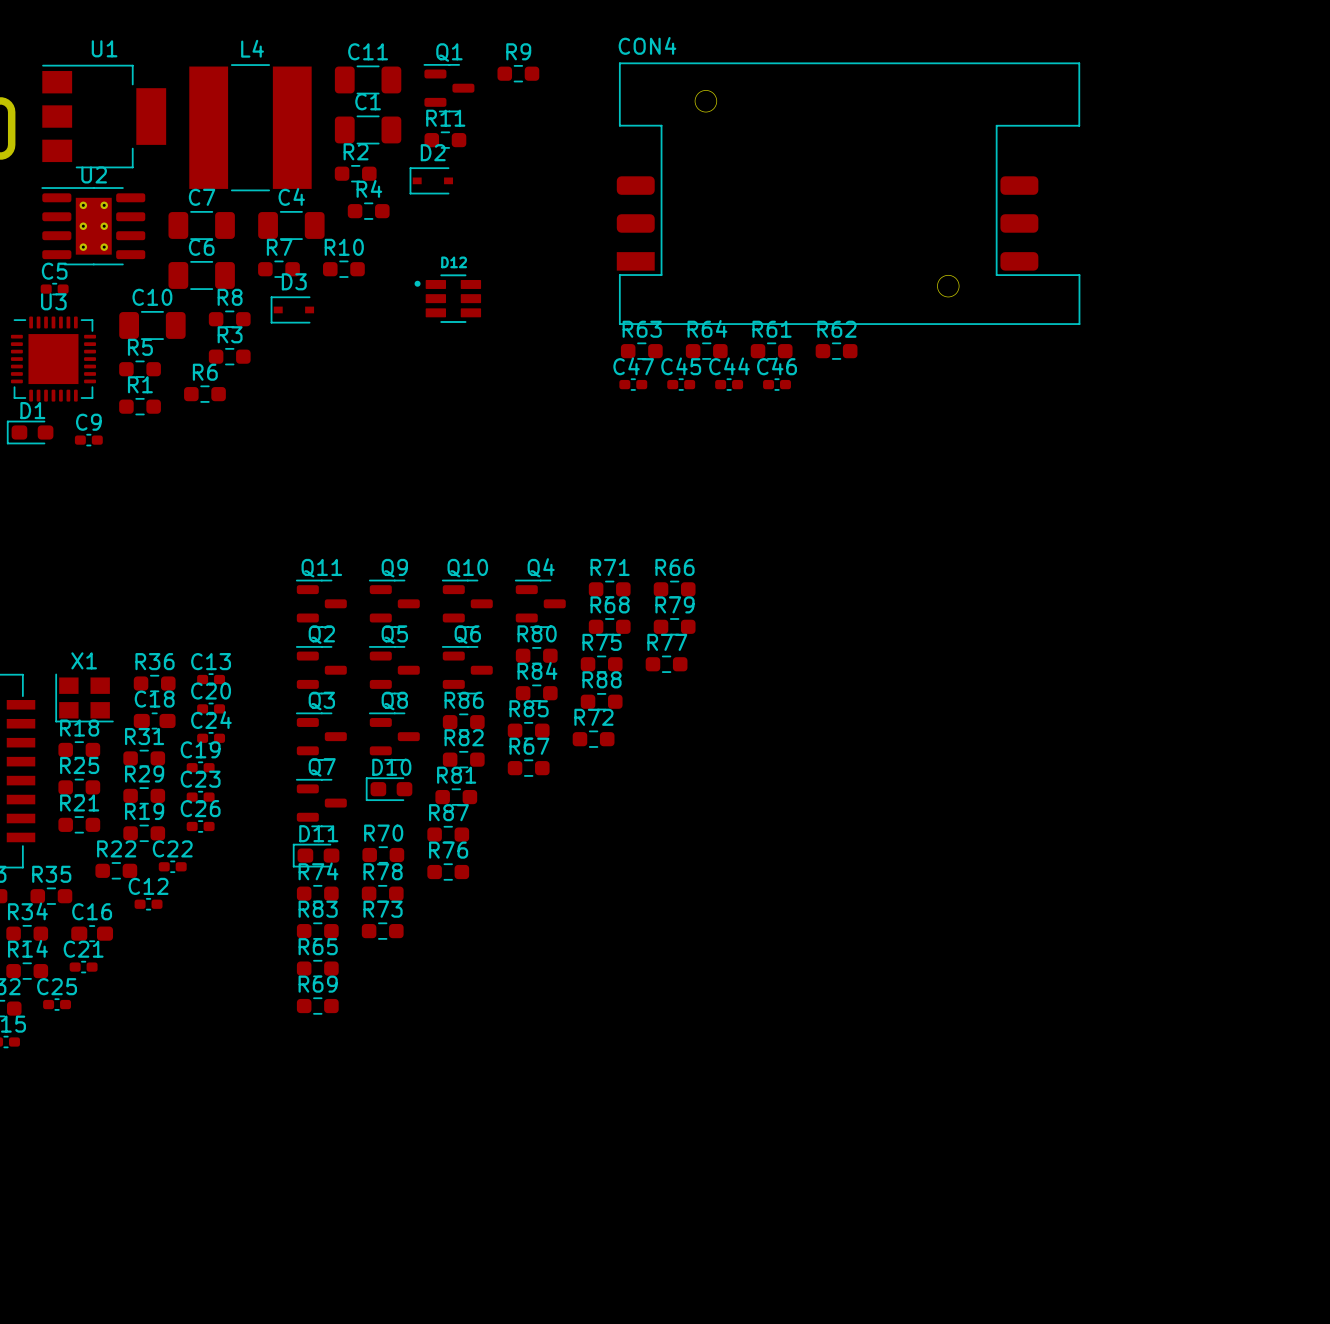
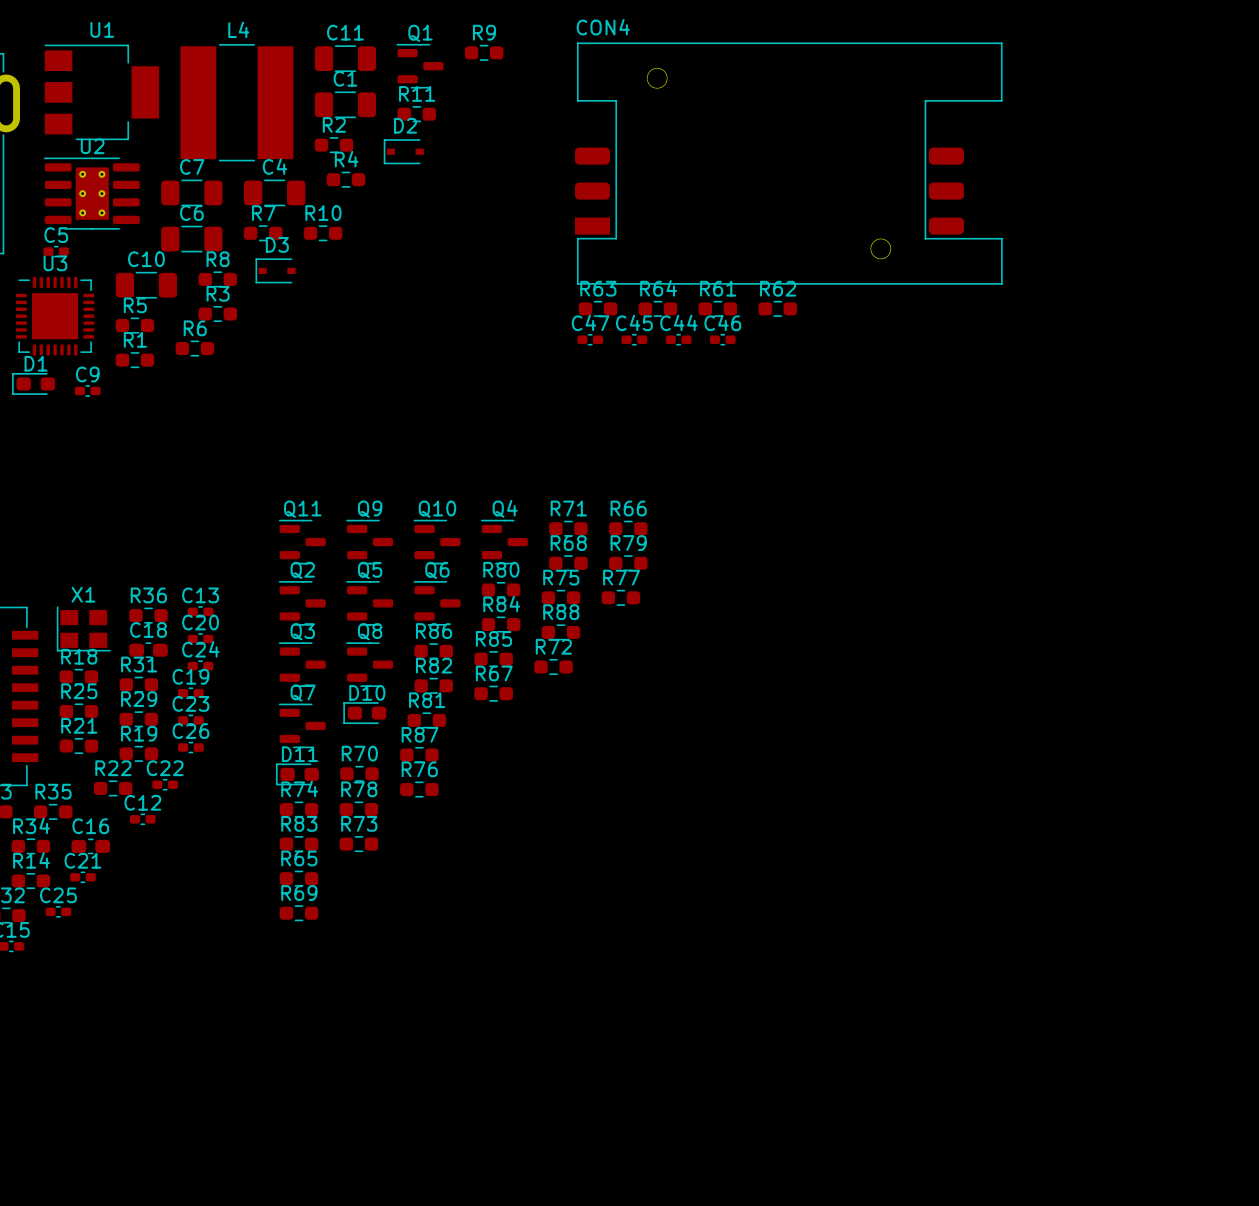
D12: (447, 298) -> none

